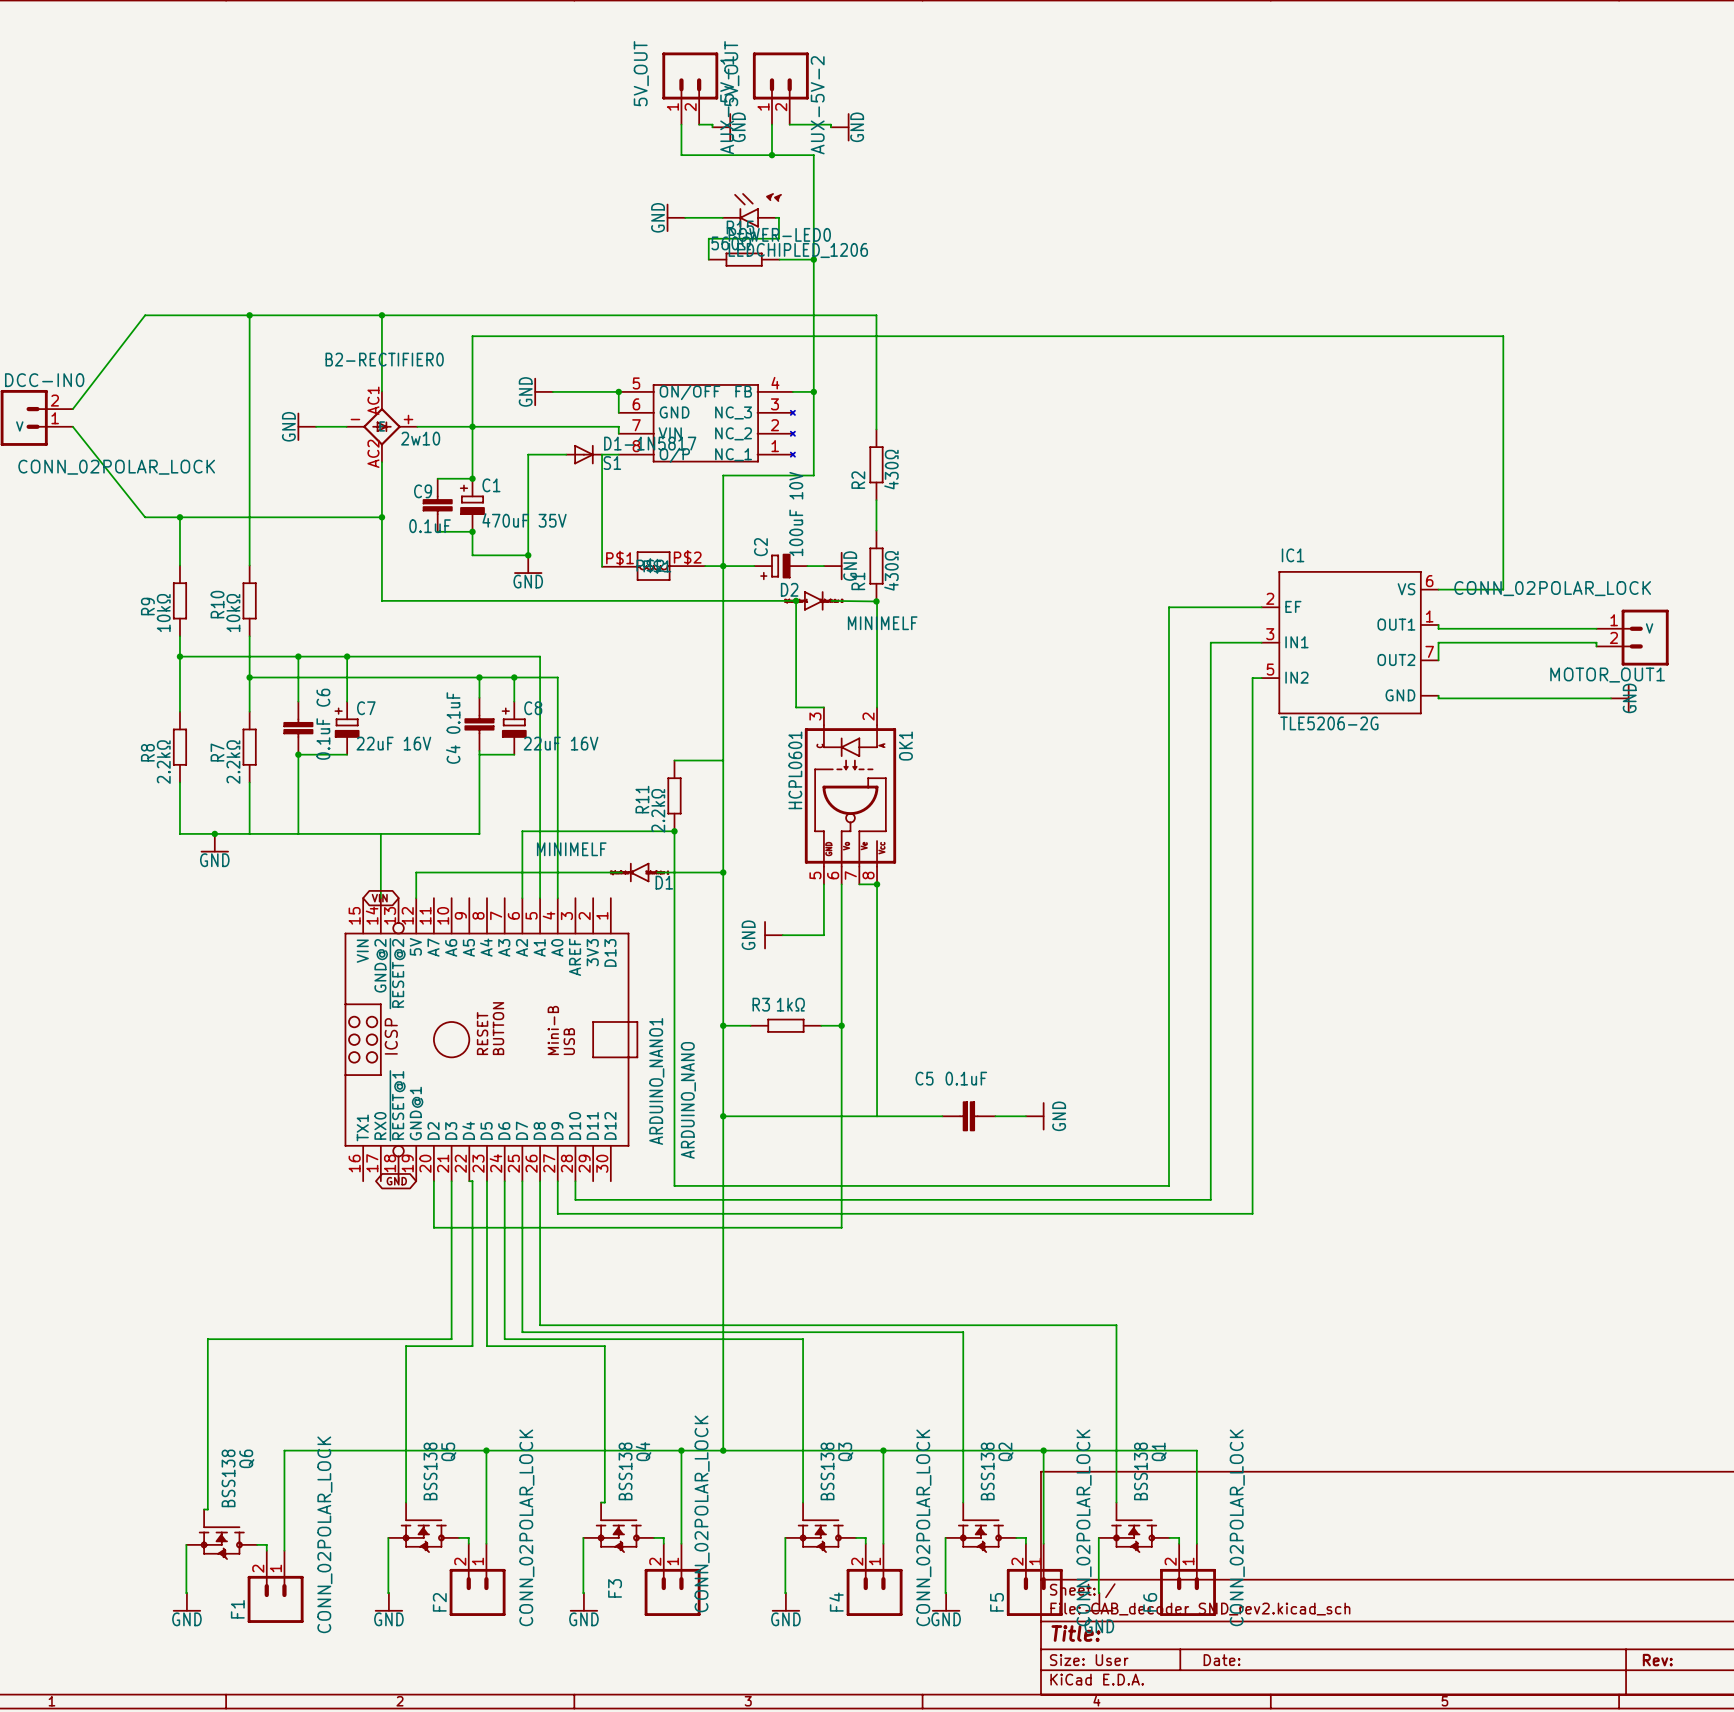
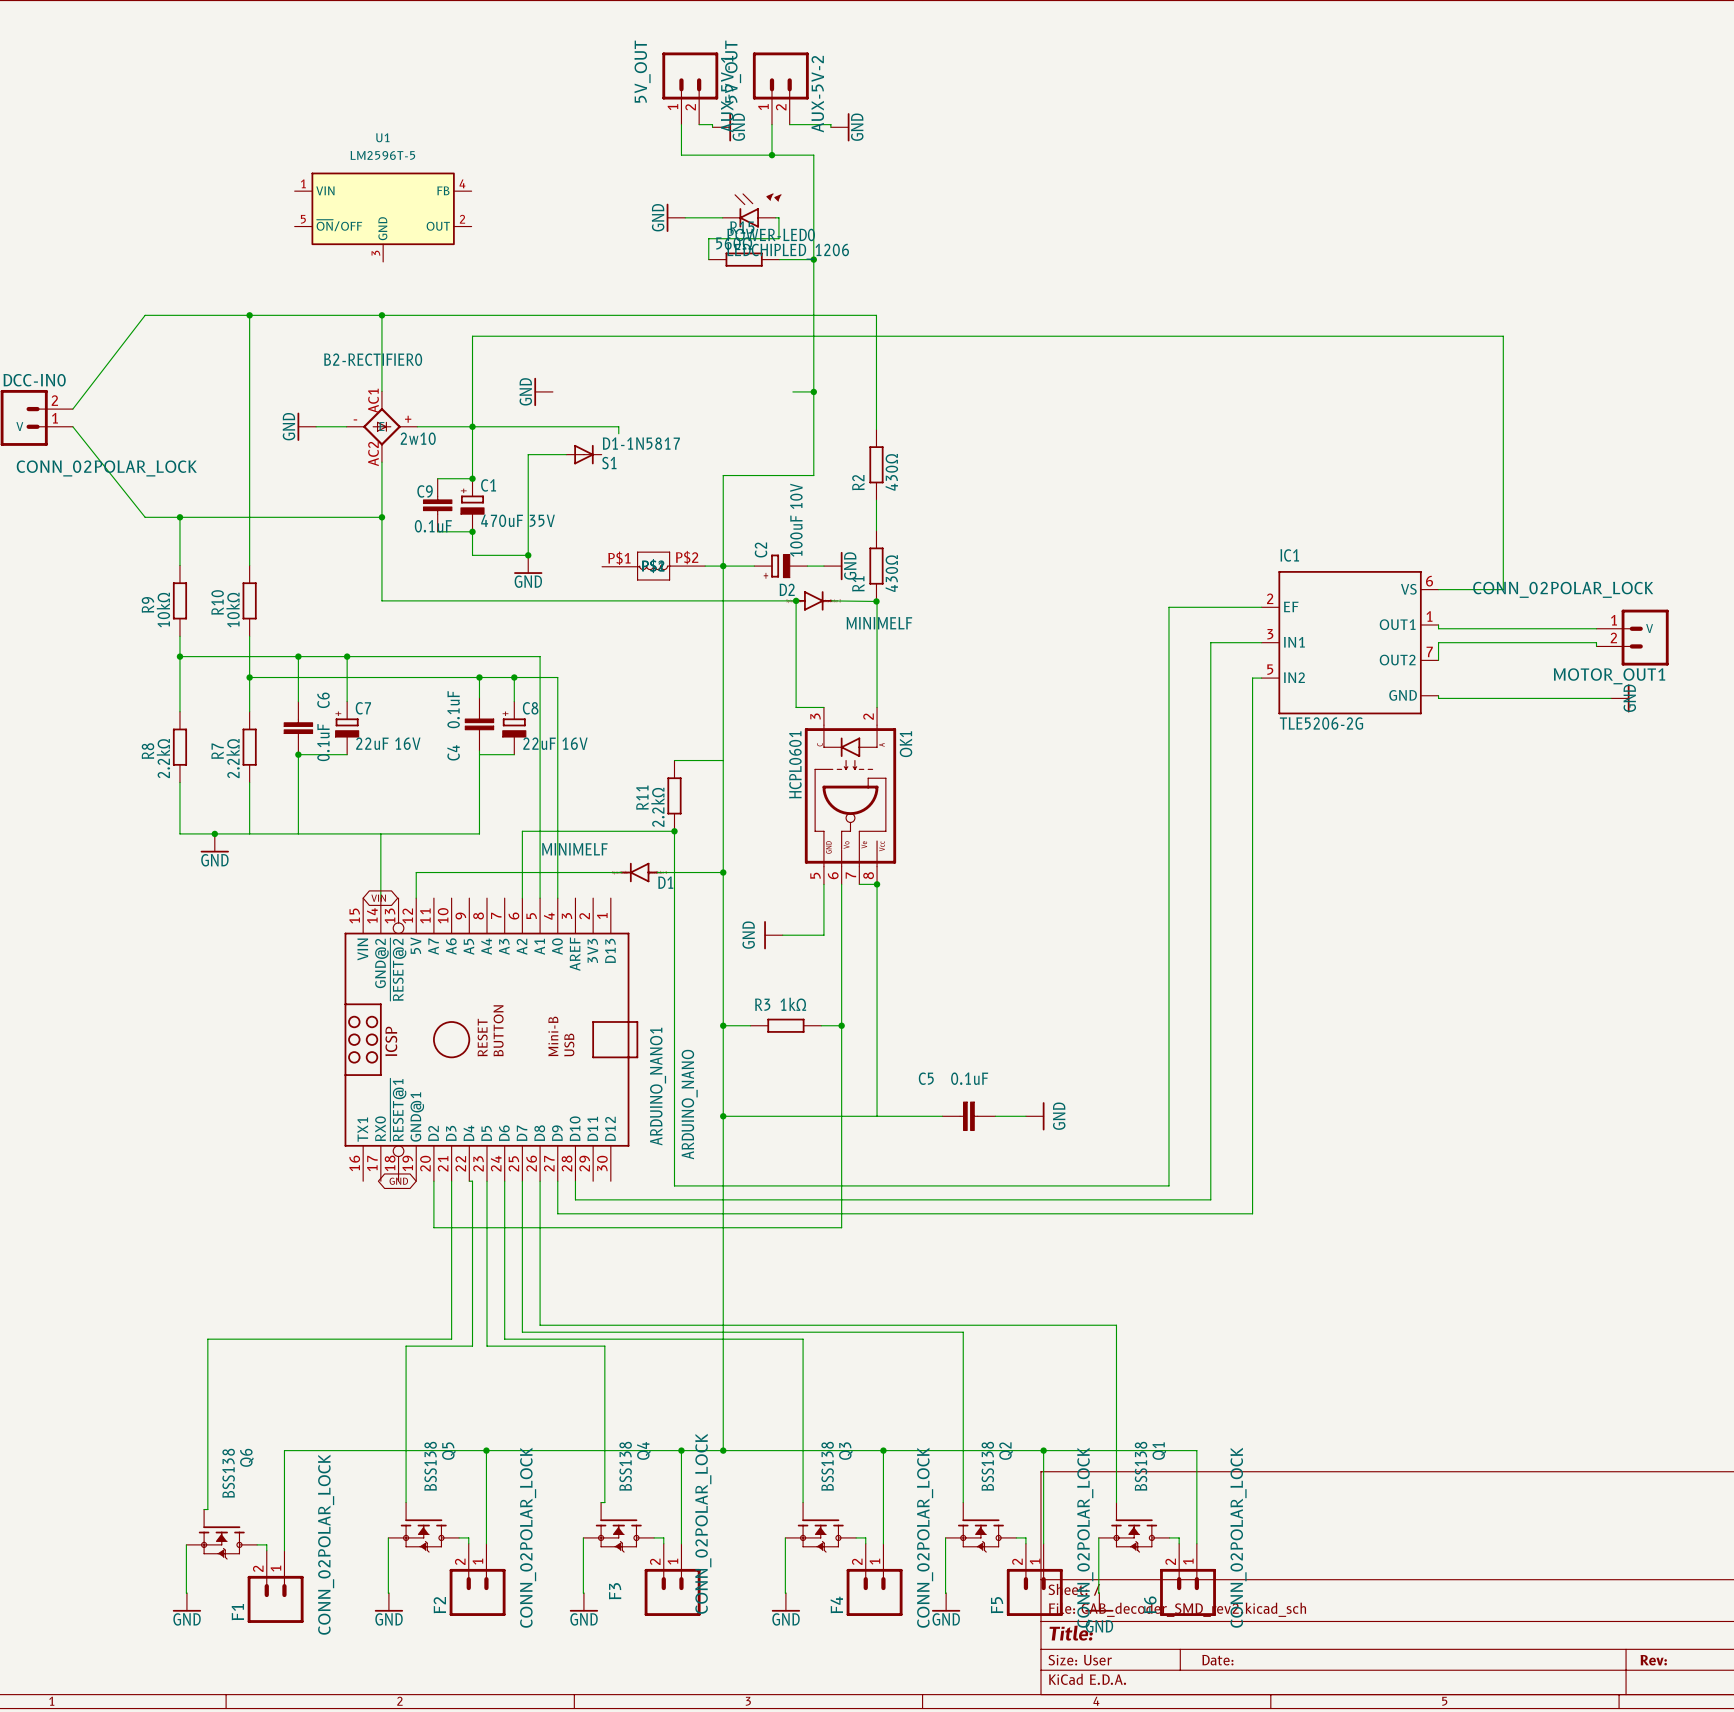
U1: none -> LM2596T-5 (383, 217)
wire: (552, 391) (618, 391) (618, 412) -> none
junction: (618, 391) -> none
part: (706, 423) -> none
wire: (601, 454) (618, 454) -> none
wire: (602, 454) (602, 566) -> none

